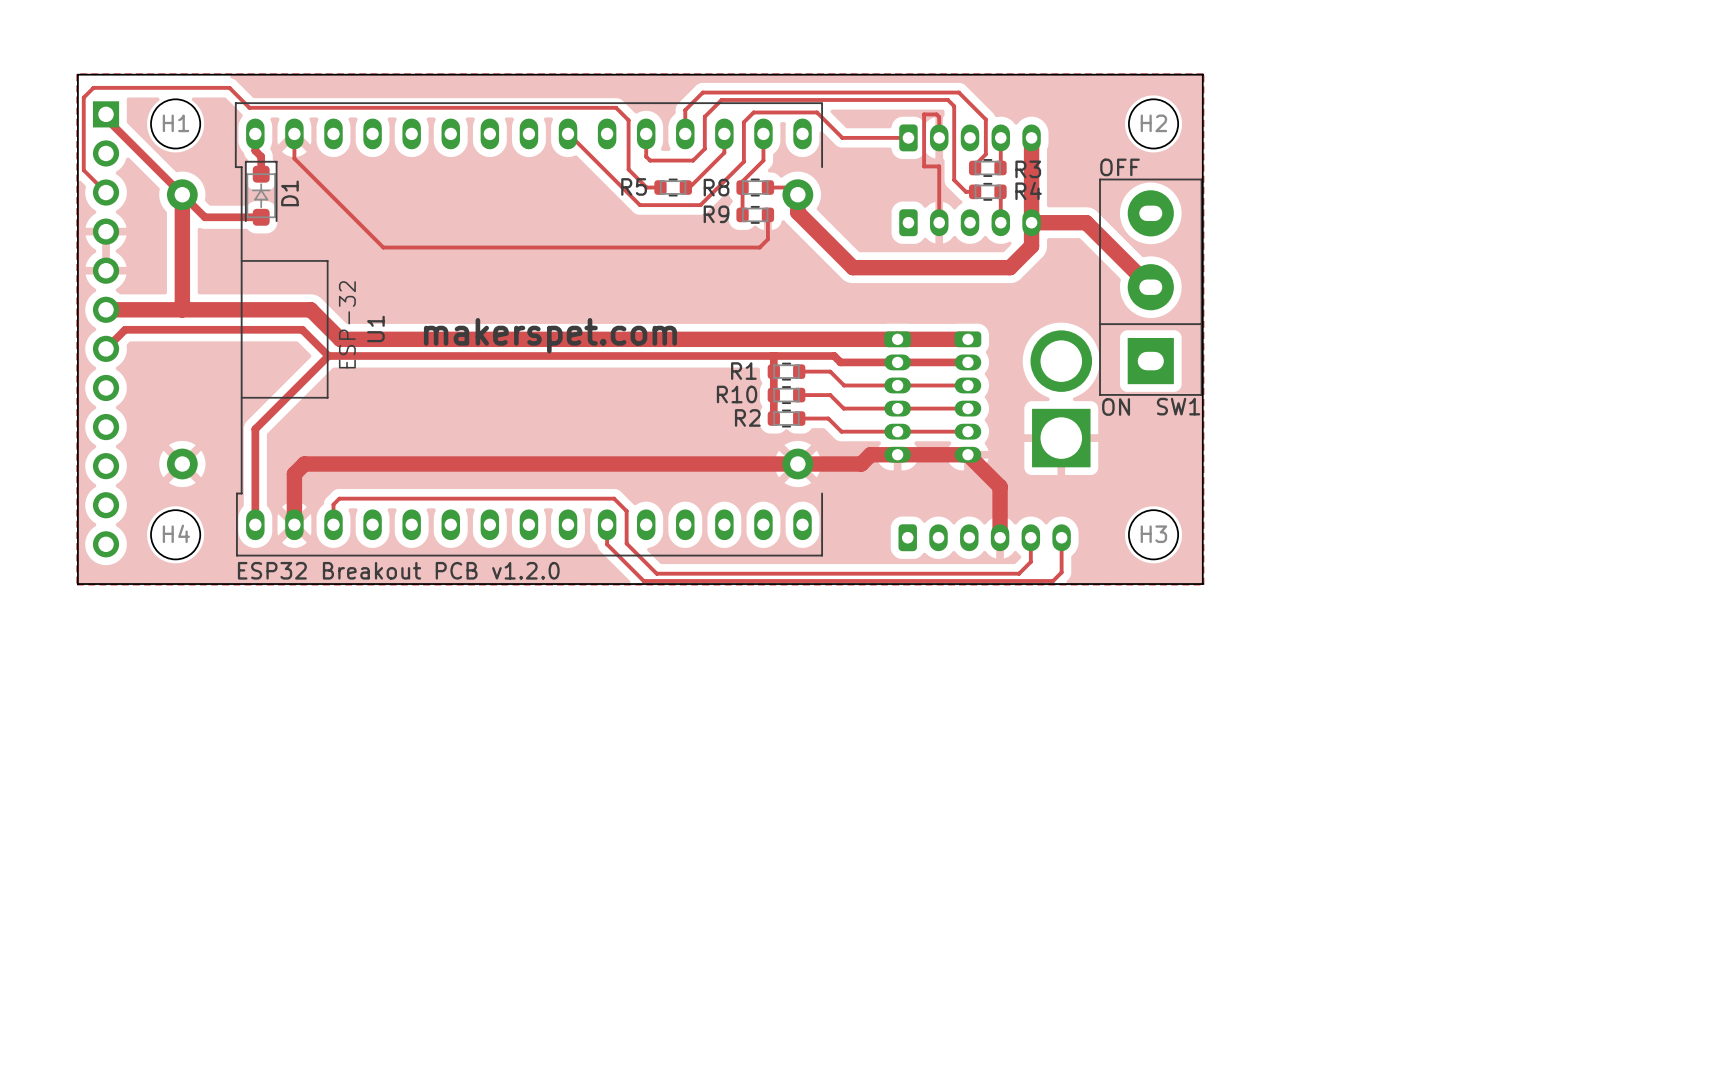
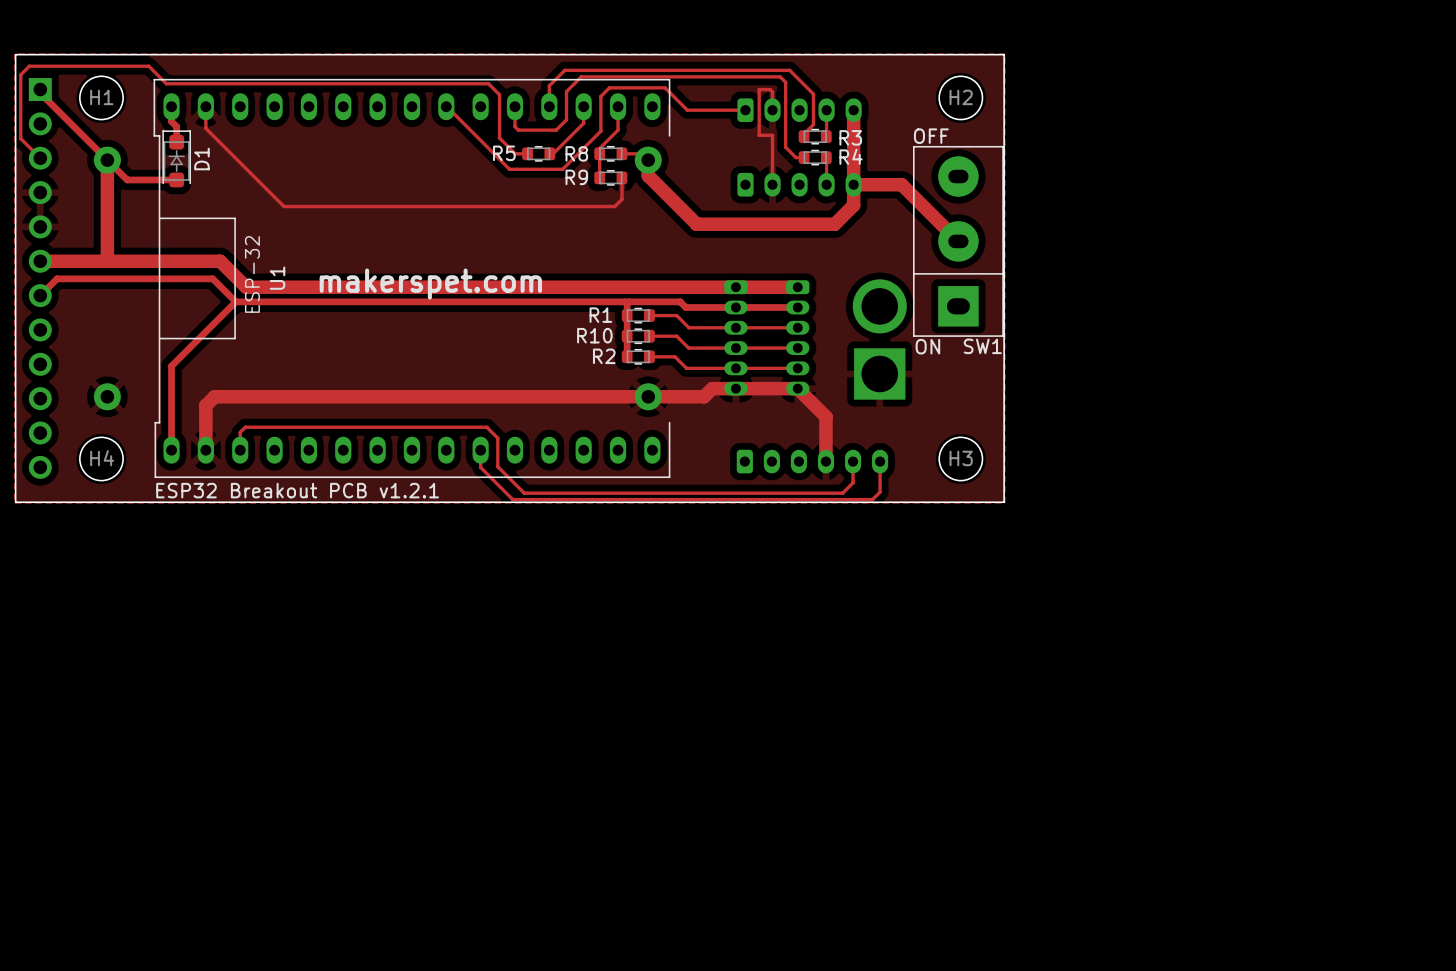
text: ESP32 Breakout PCB v1.2.0 (398, 570) -> ESP32 Breakout PCB v1.2.1 (297, 490)

